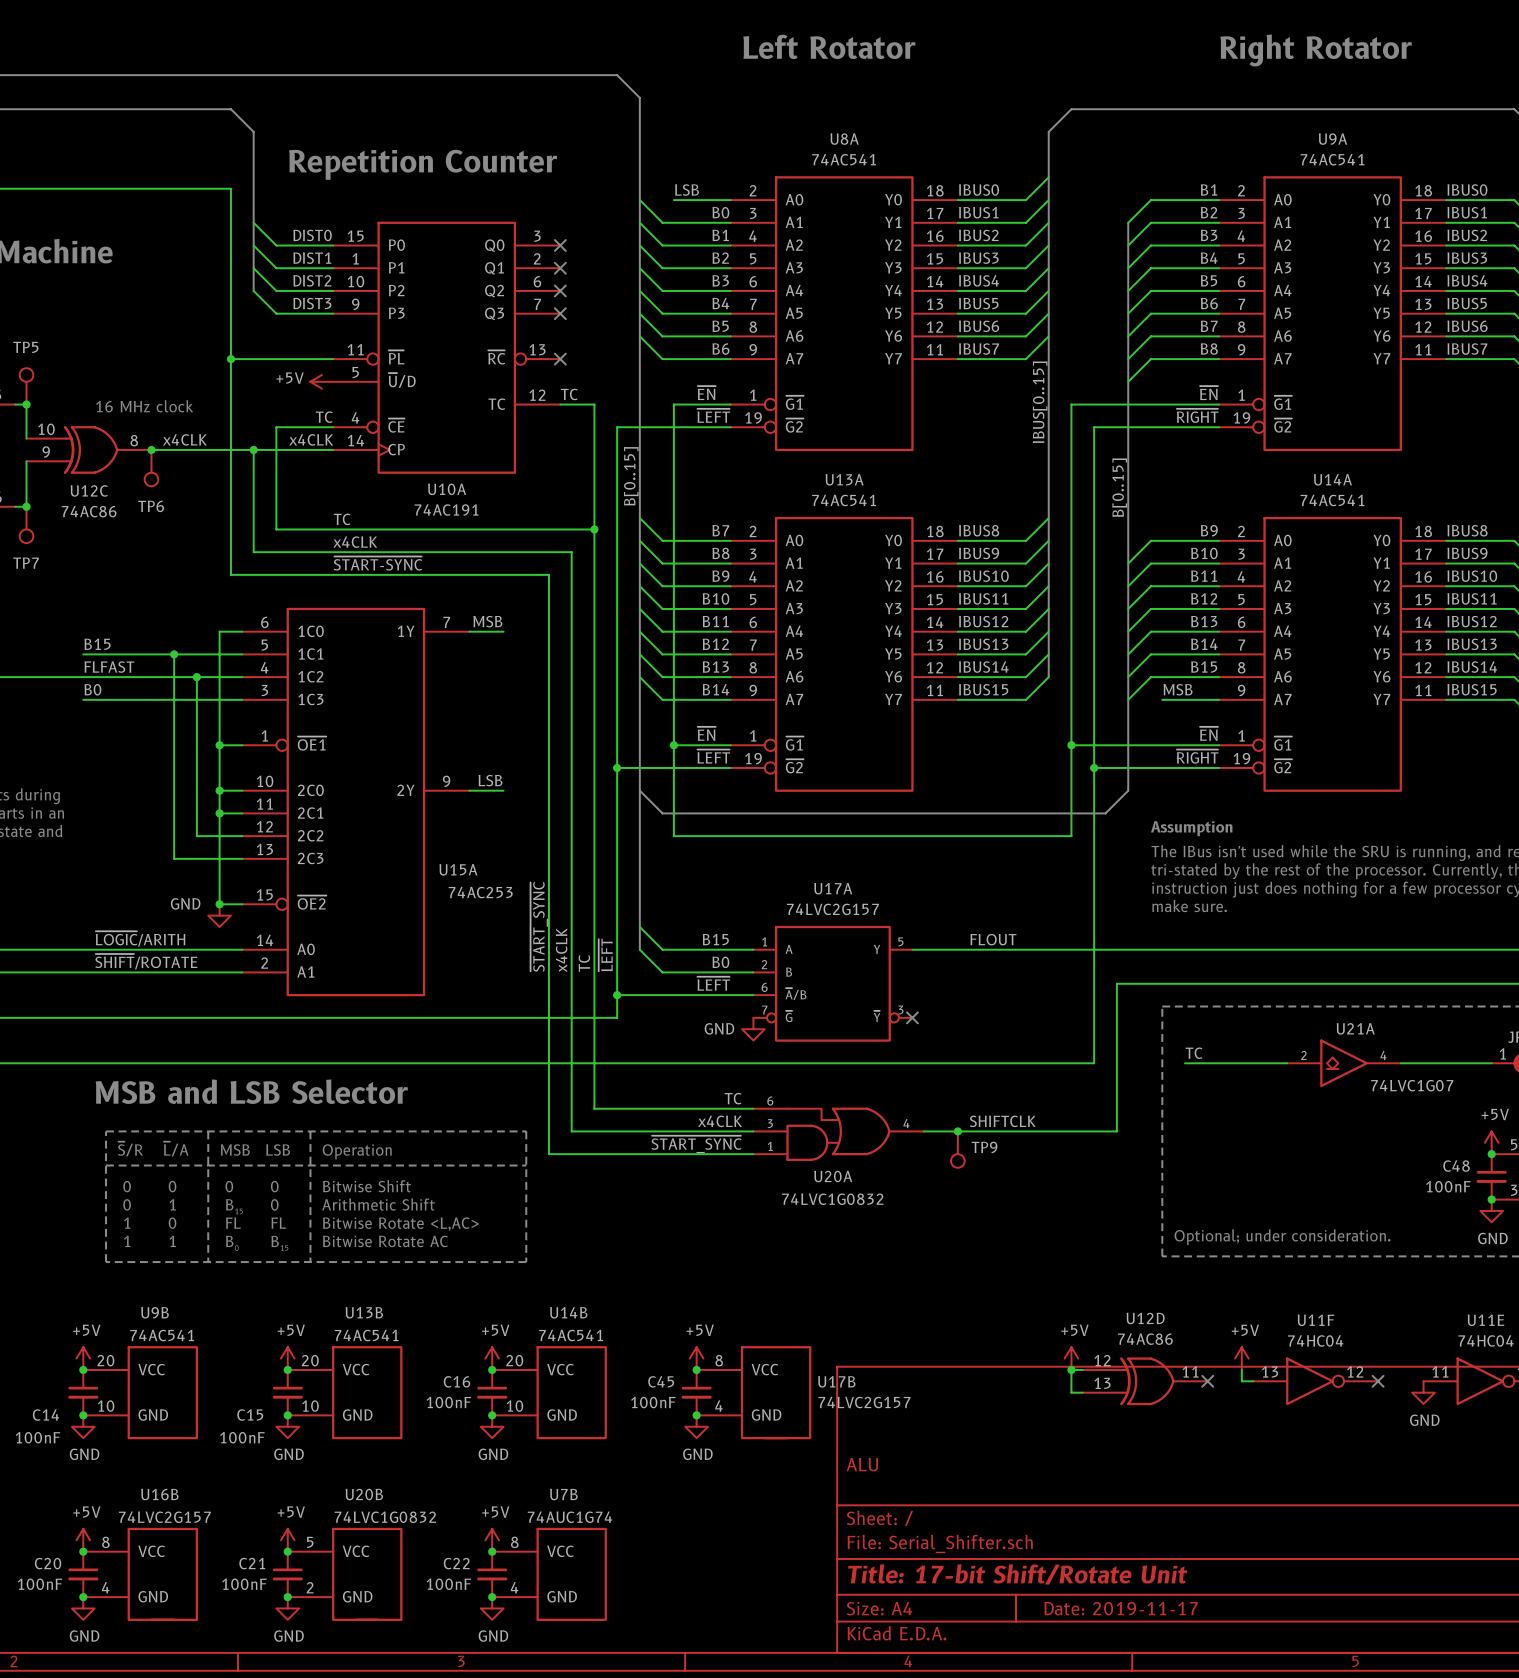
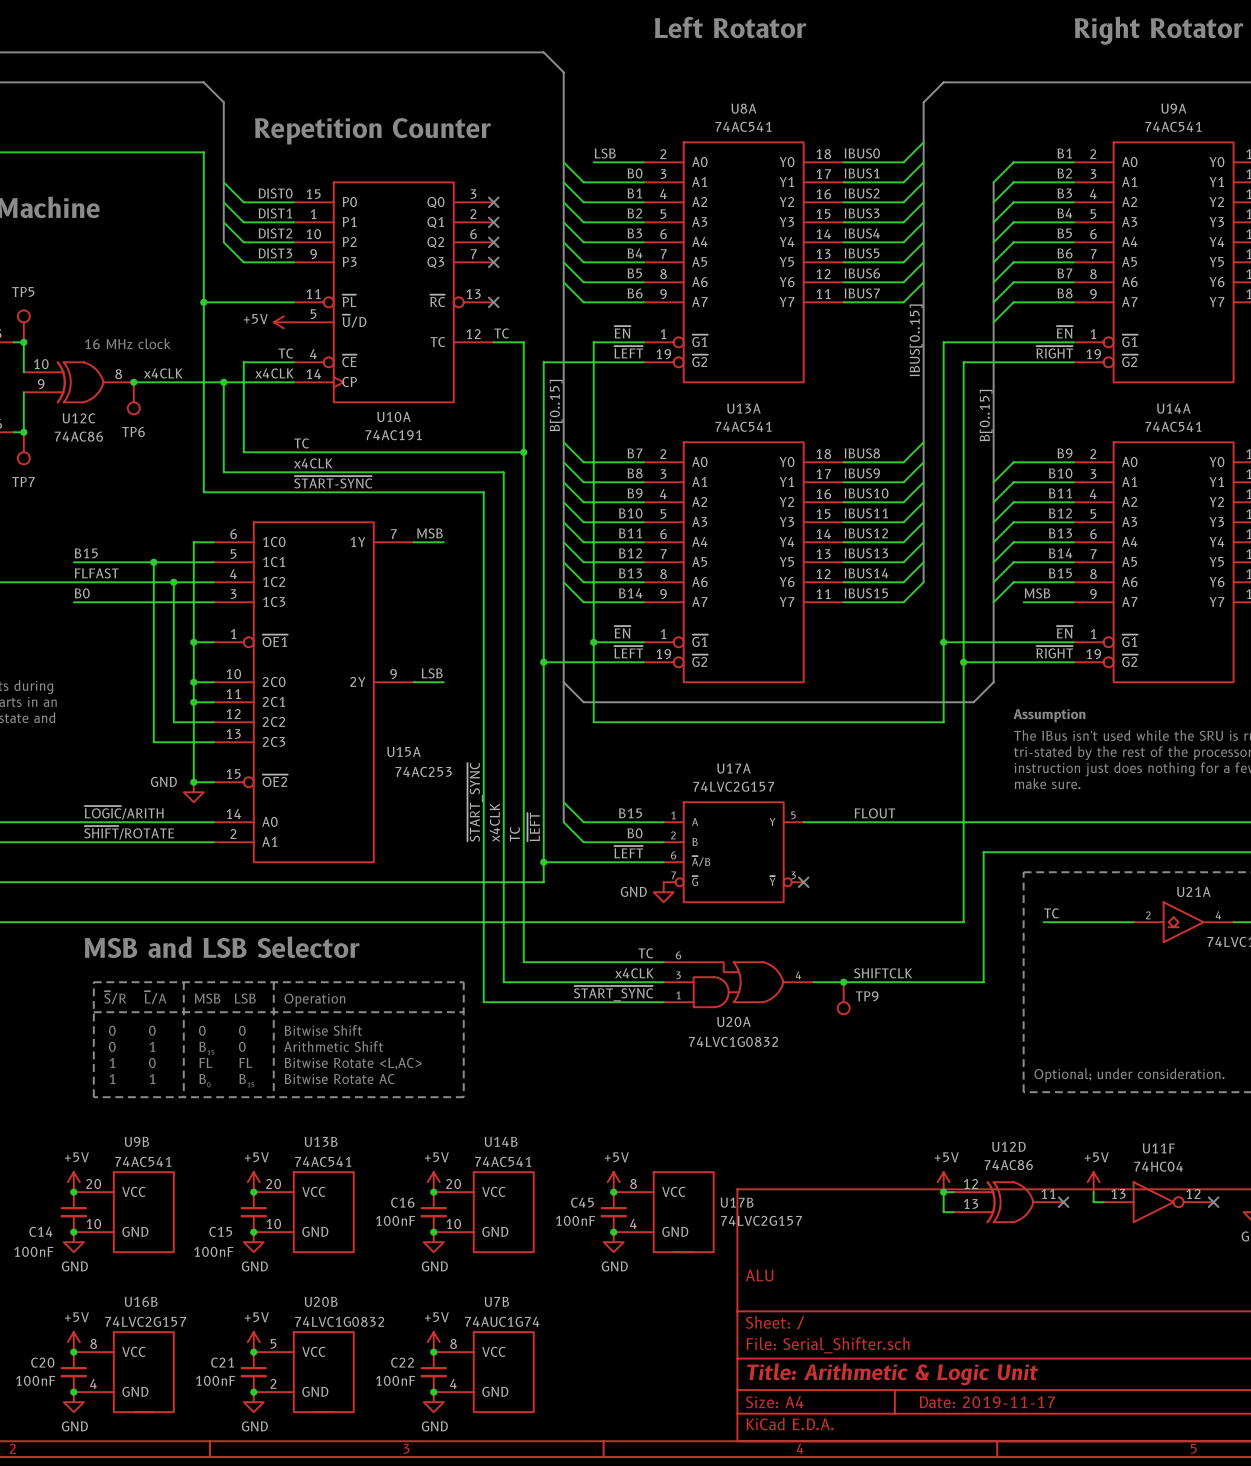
title block: Title: 17-bit Shift/Rotate Unit (1017, 1574) -> Title: Arithmetic & Logic Unit (892, 1374)

